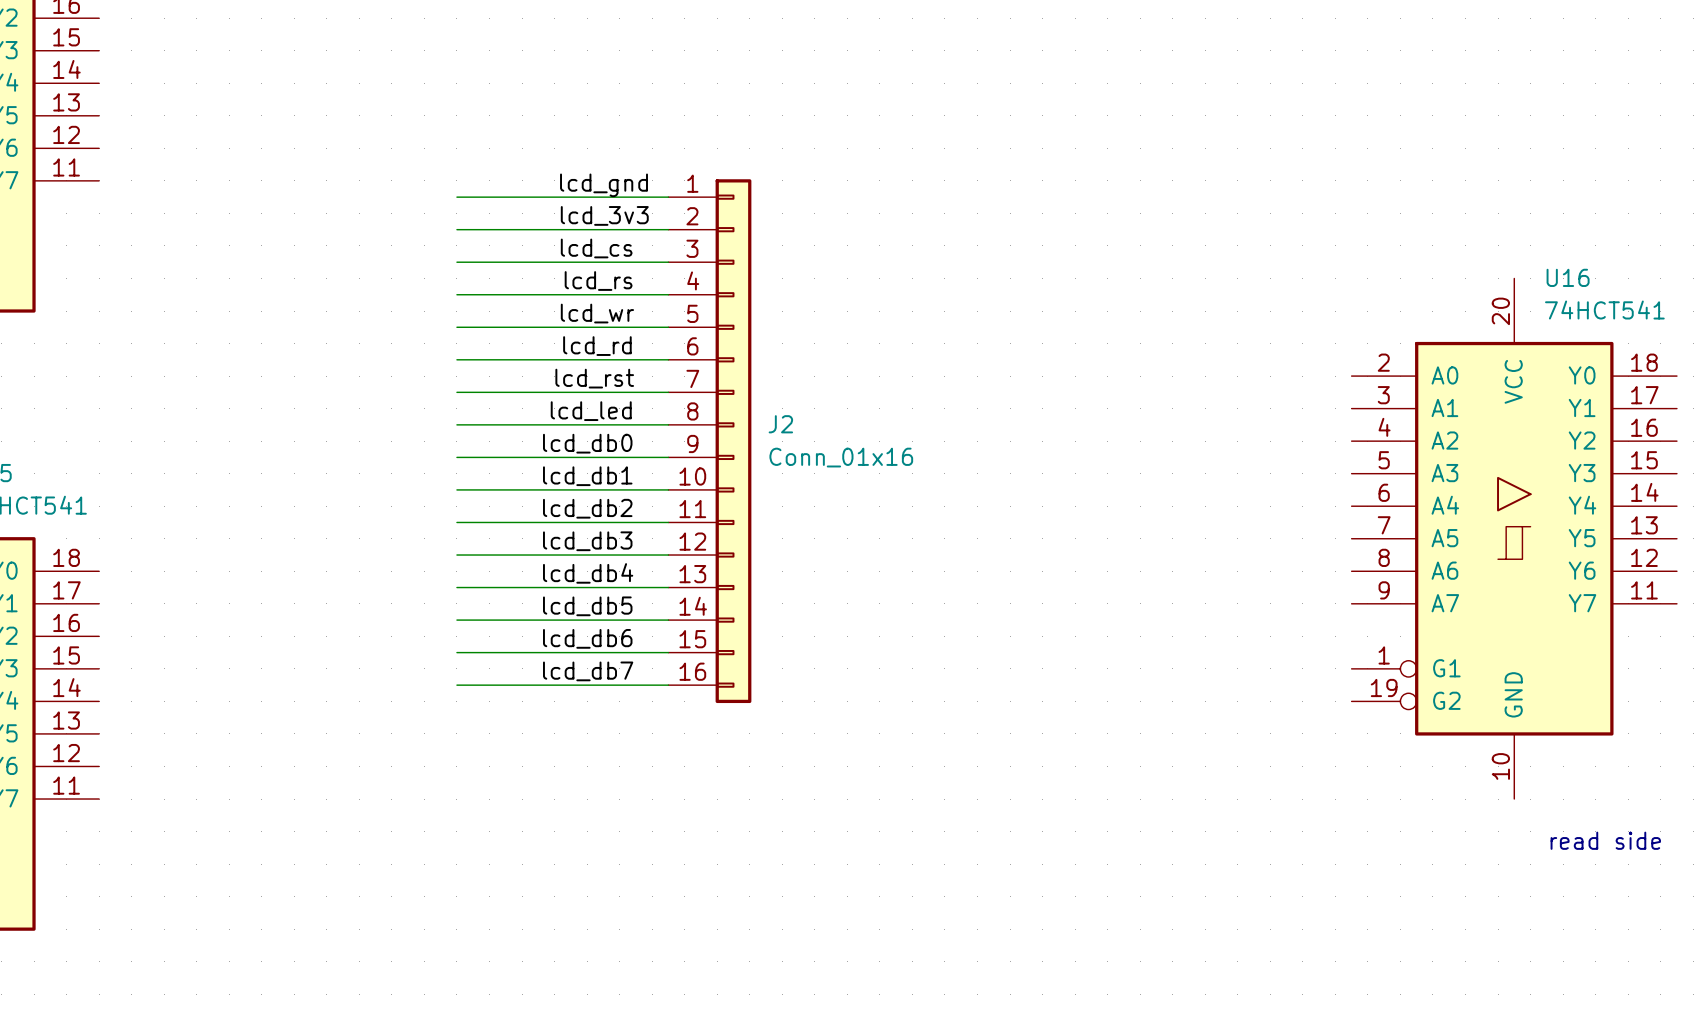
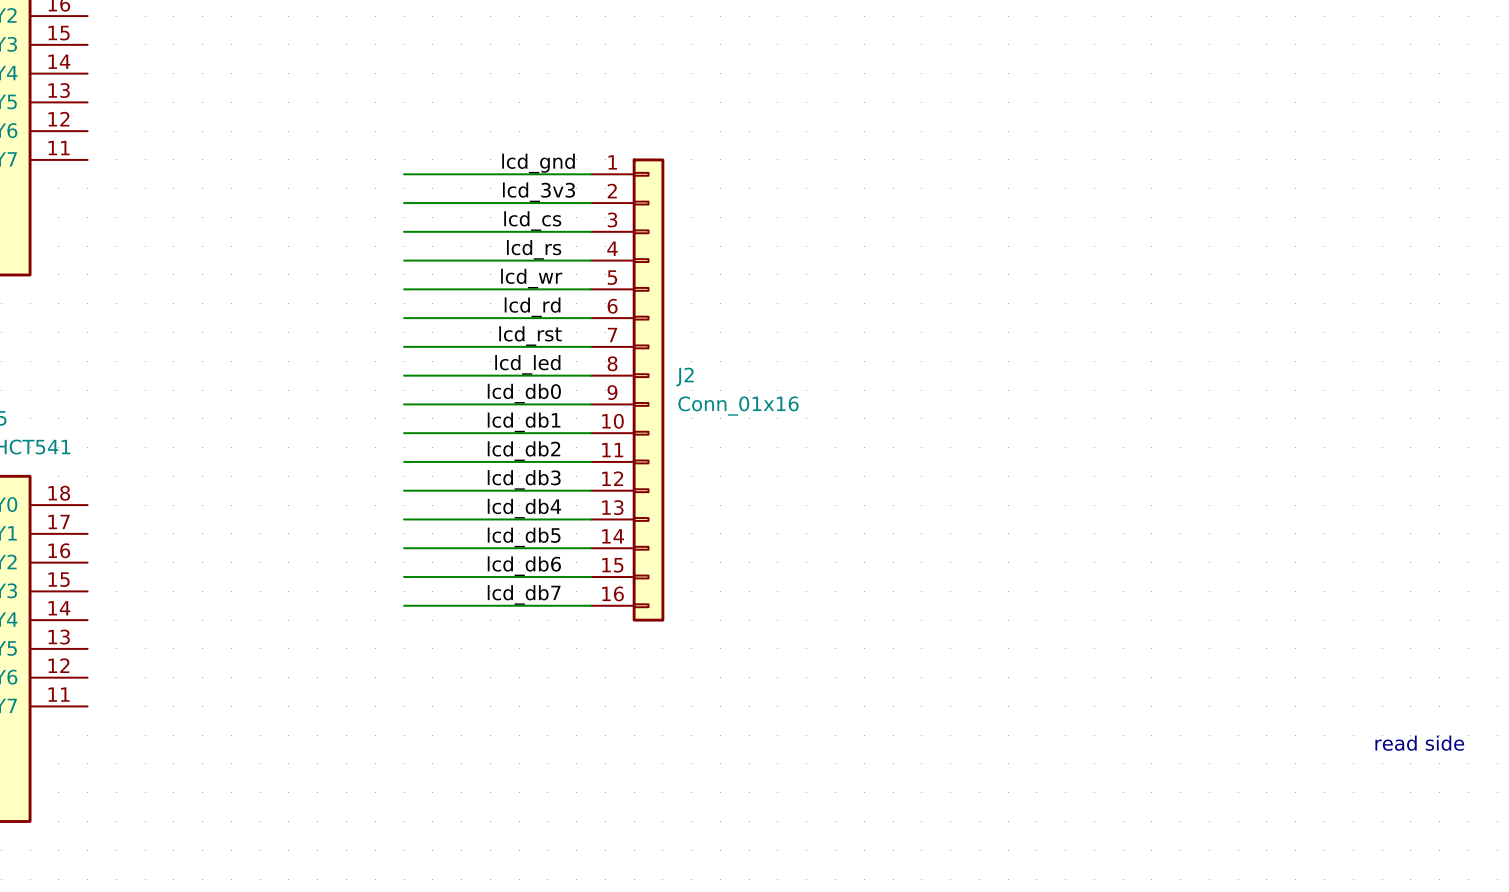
U16: 74HCT541 (1514, 538) -> none

